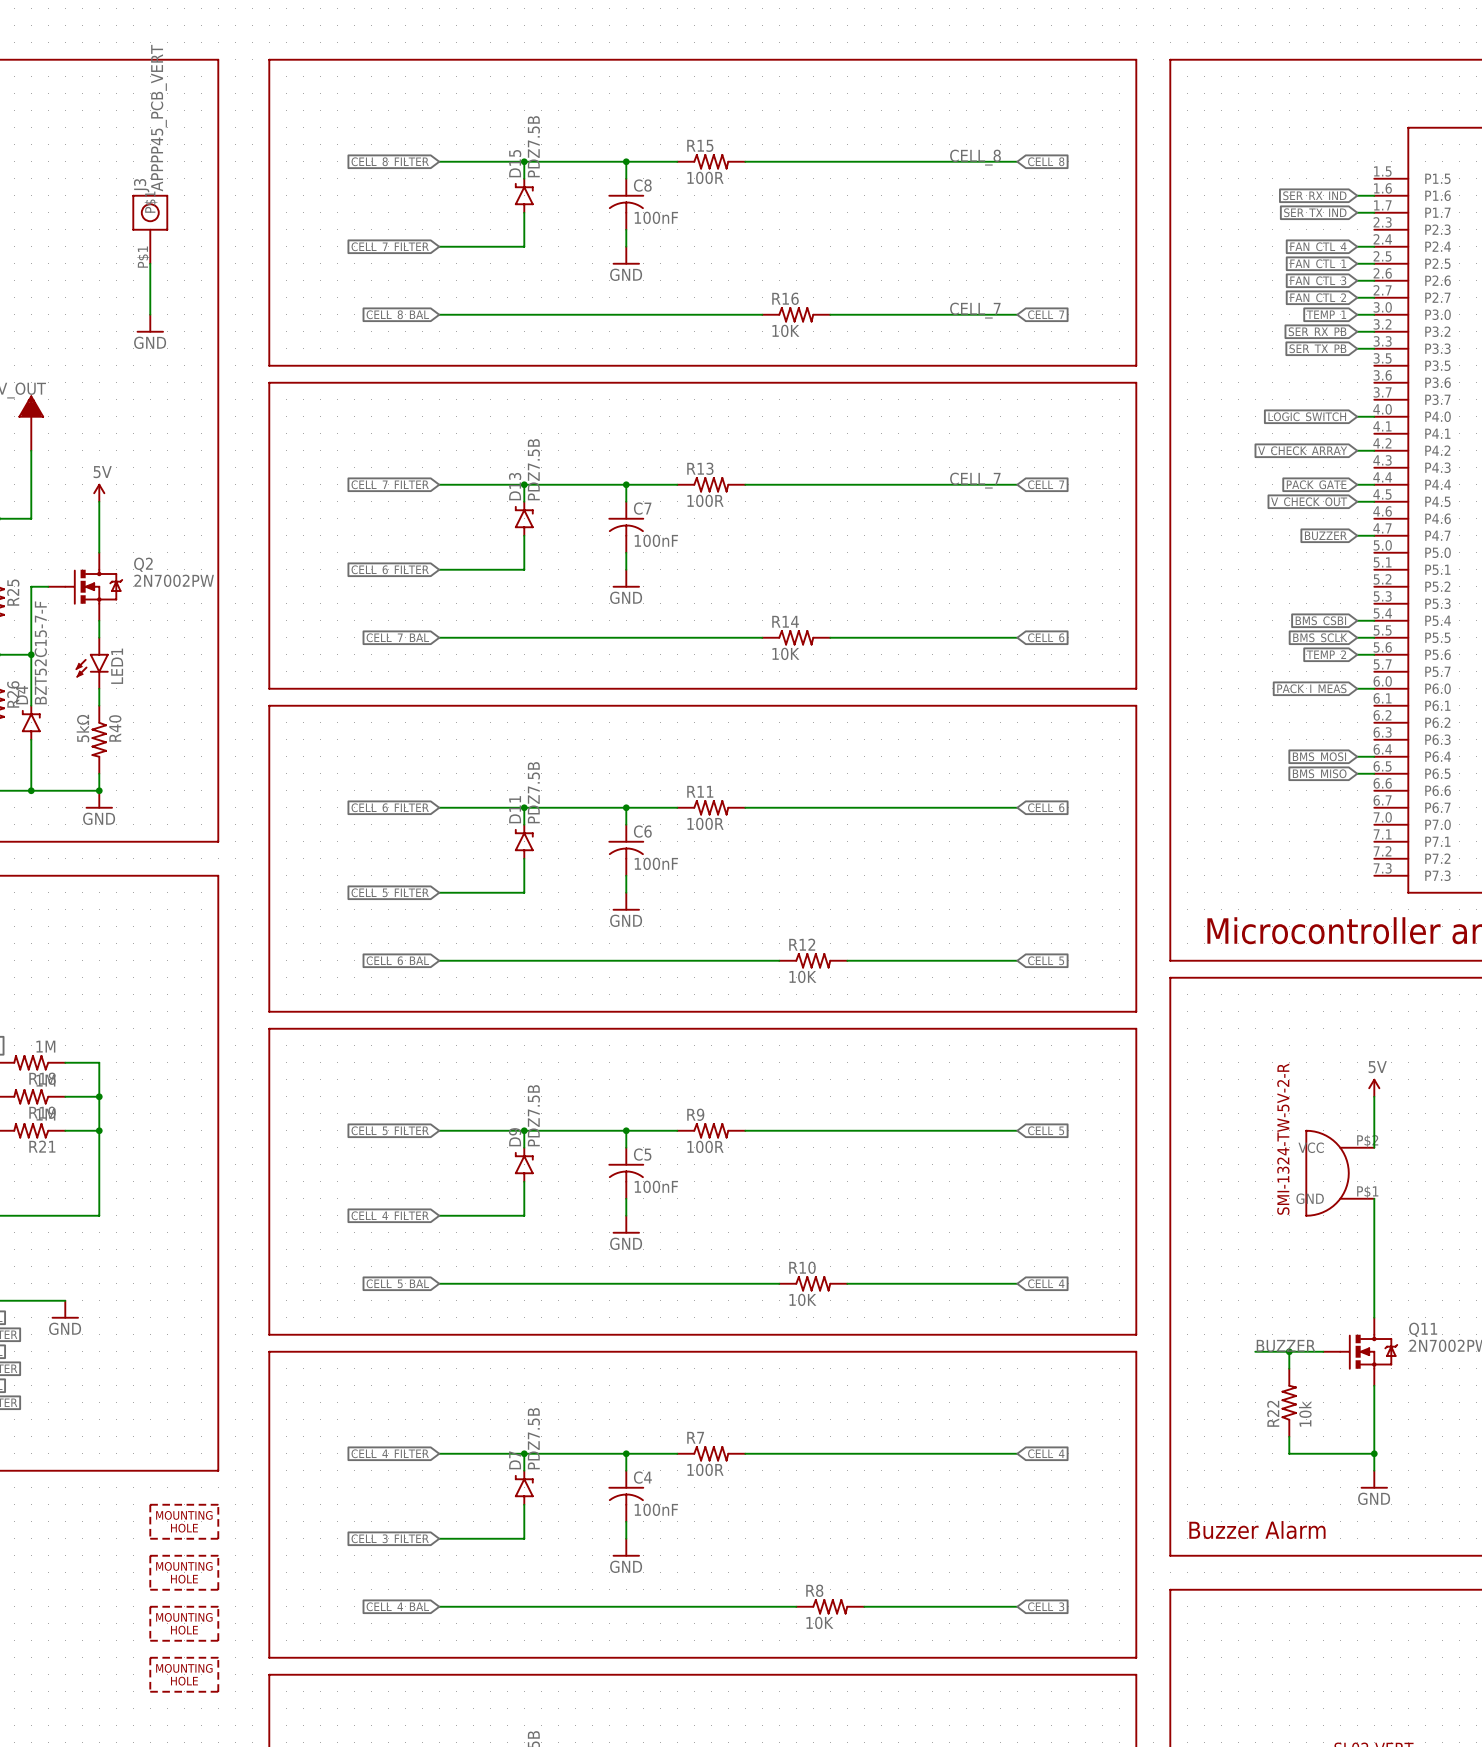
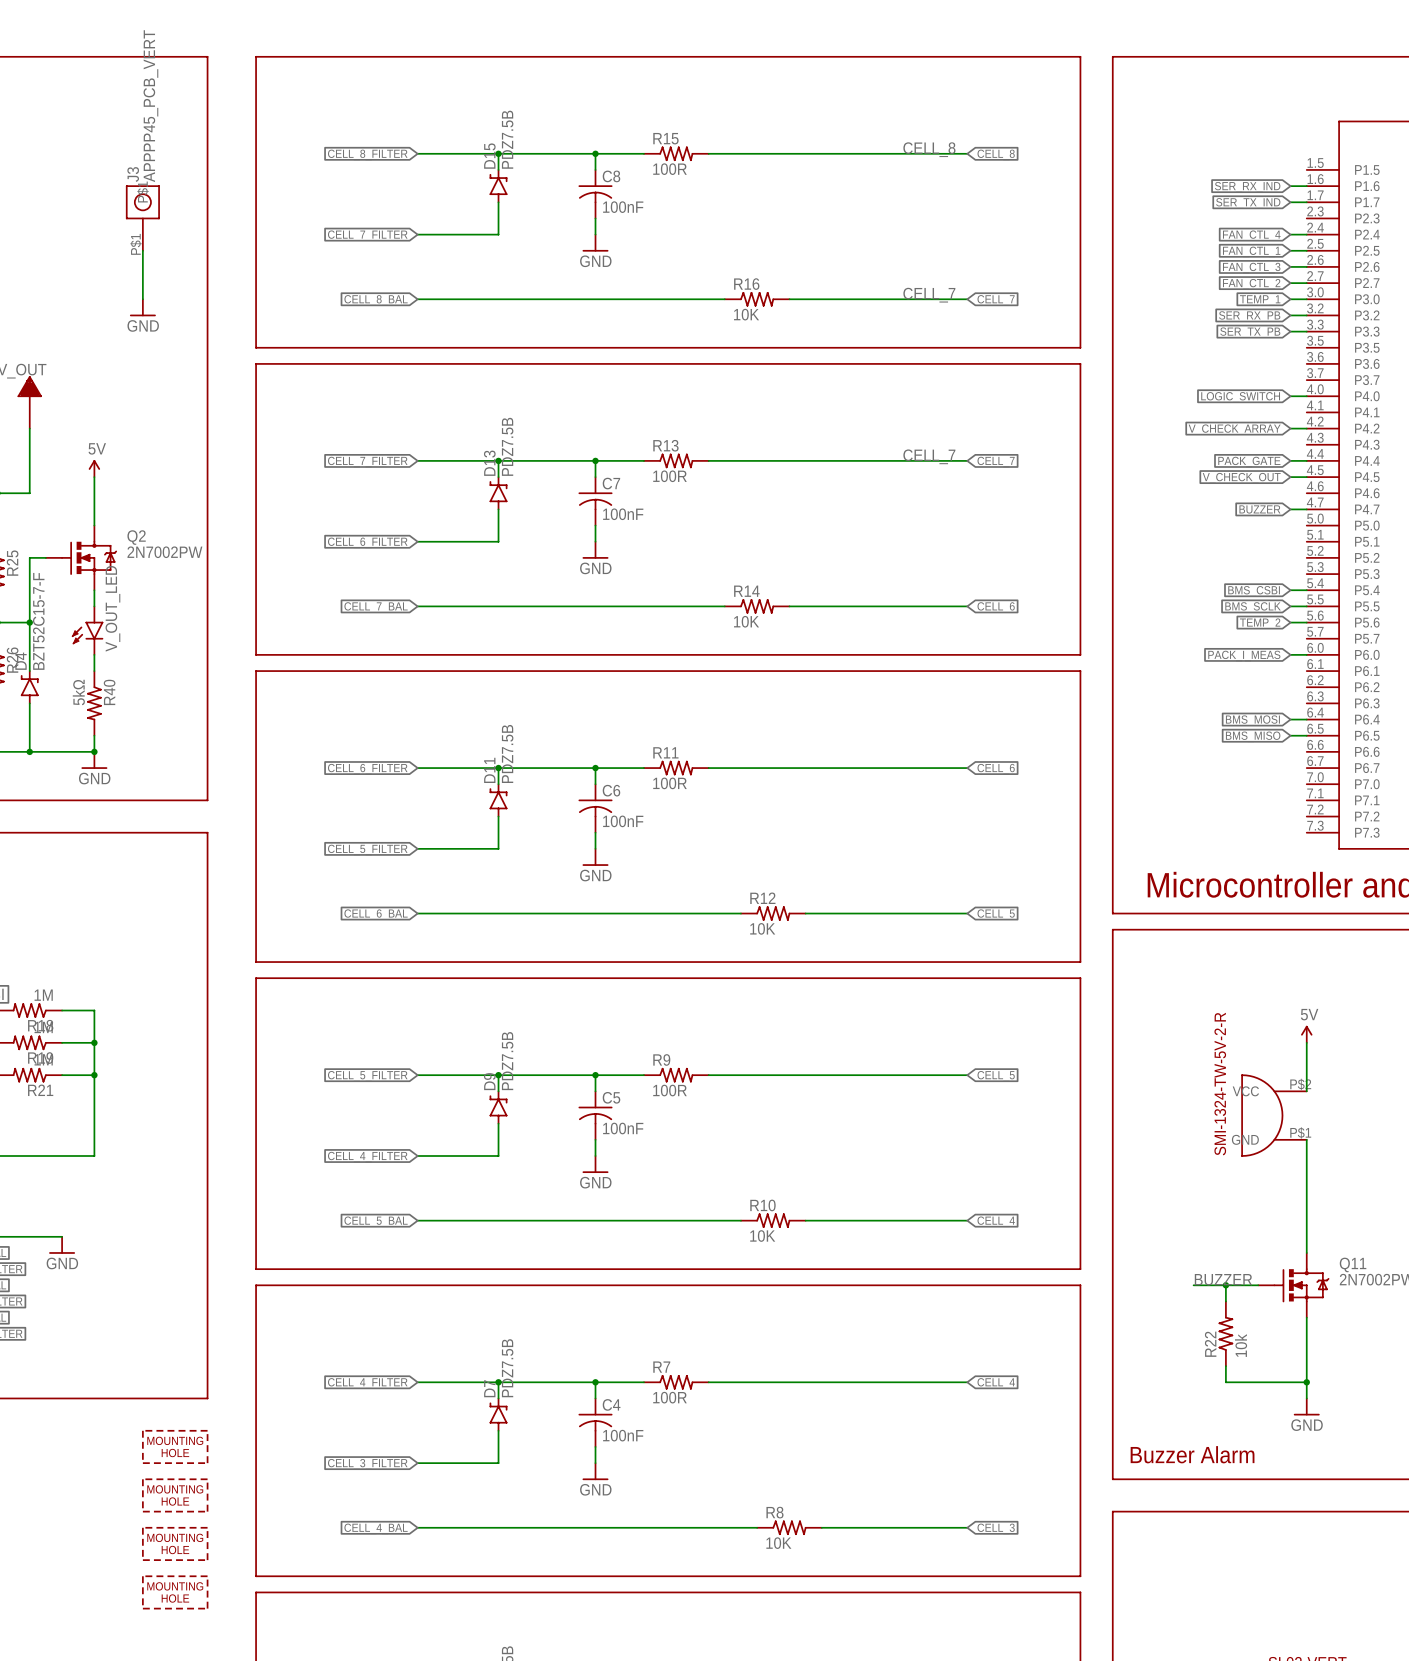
LED1 name: LED1 (117, 666) -> V_OUT_LED (112, 608)

